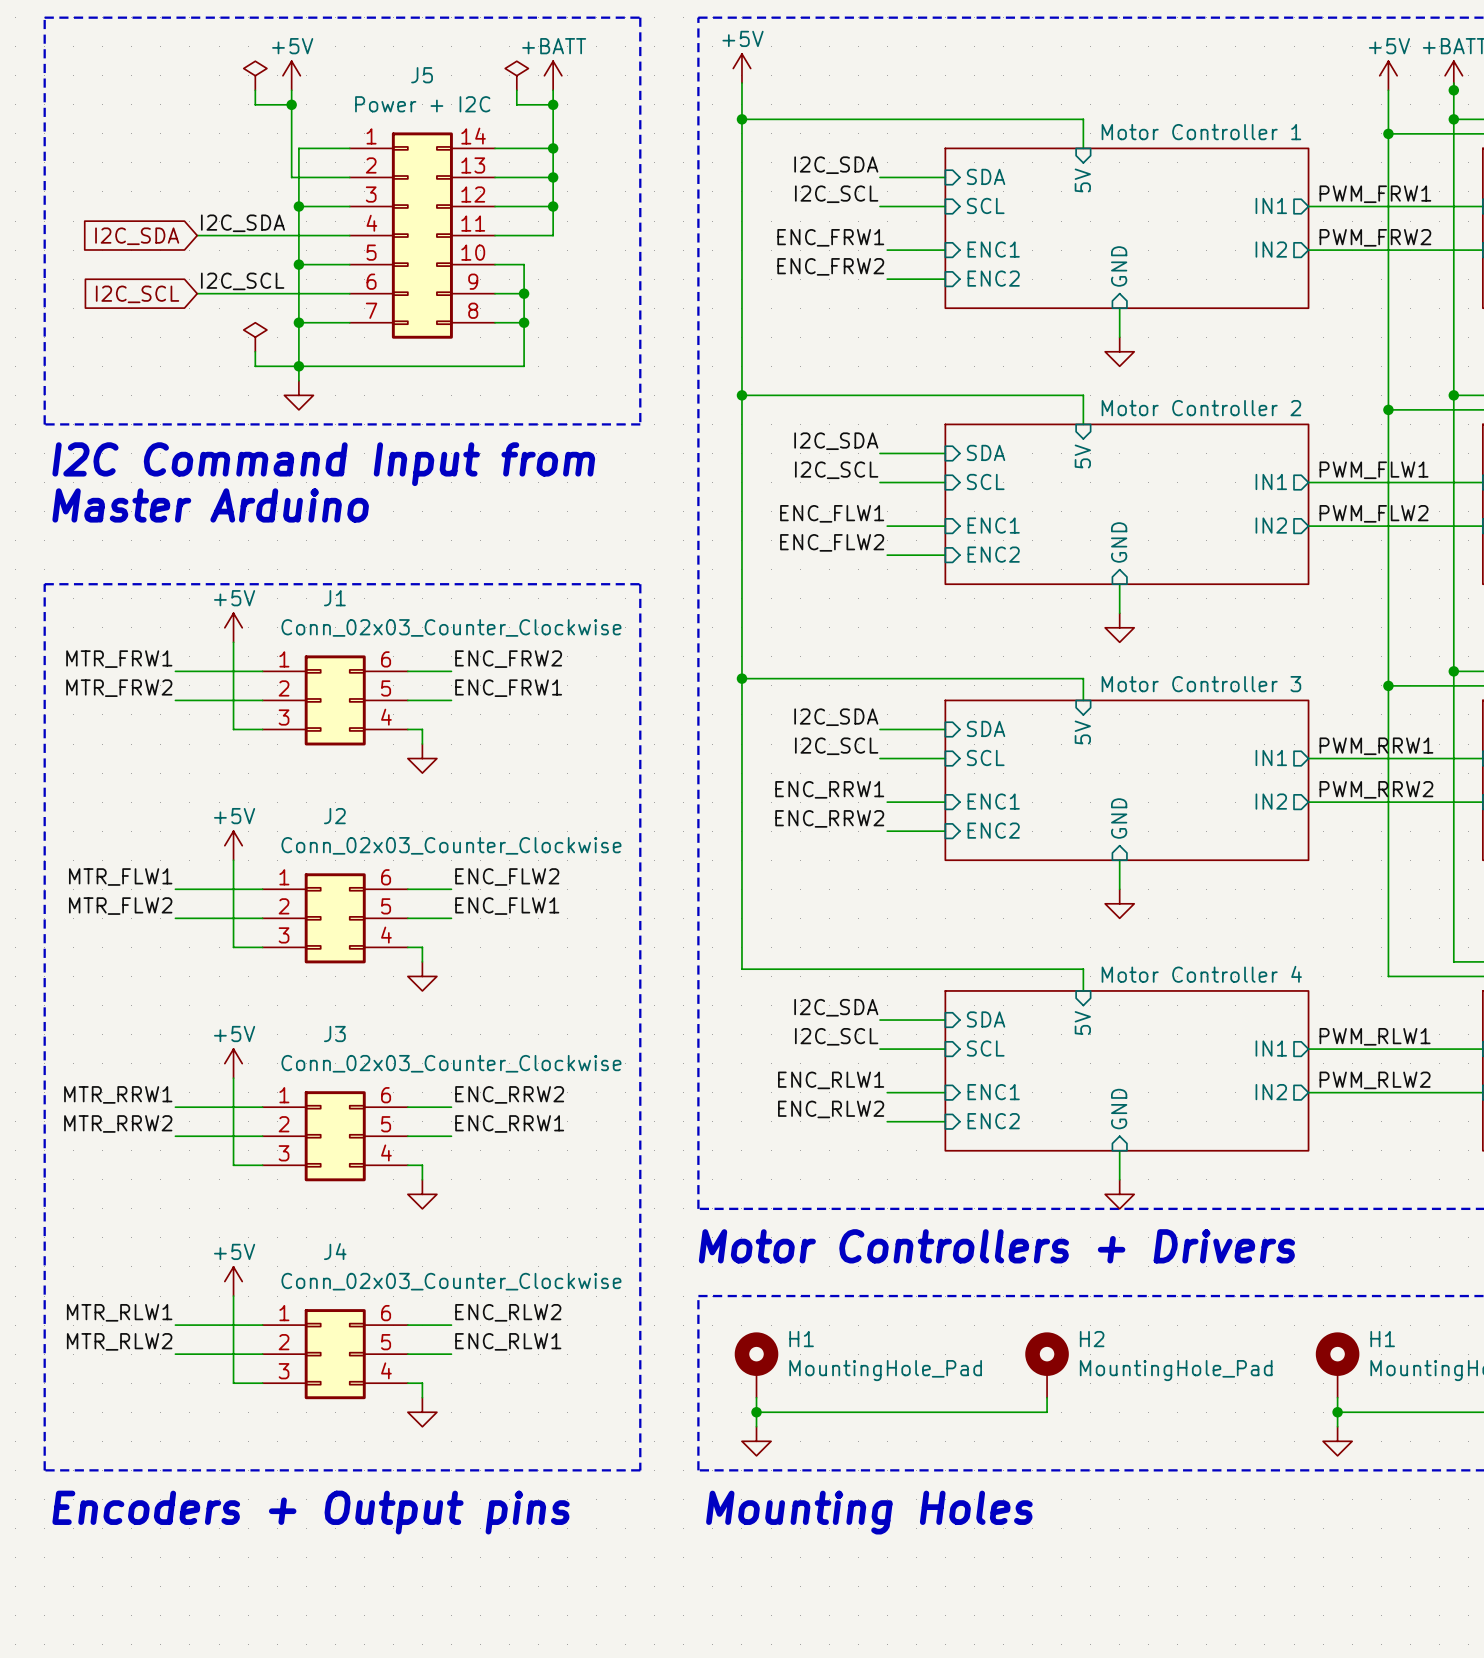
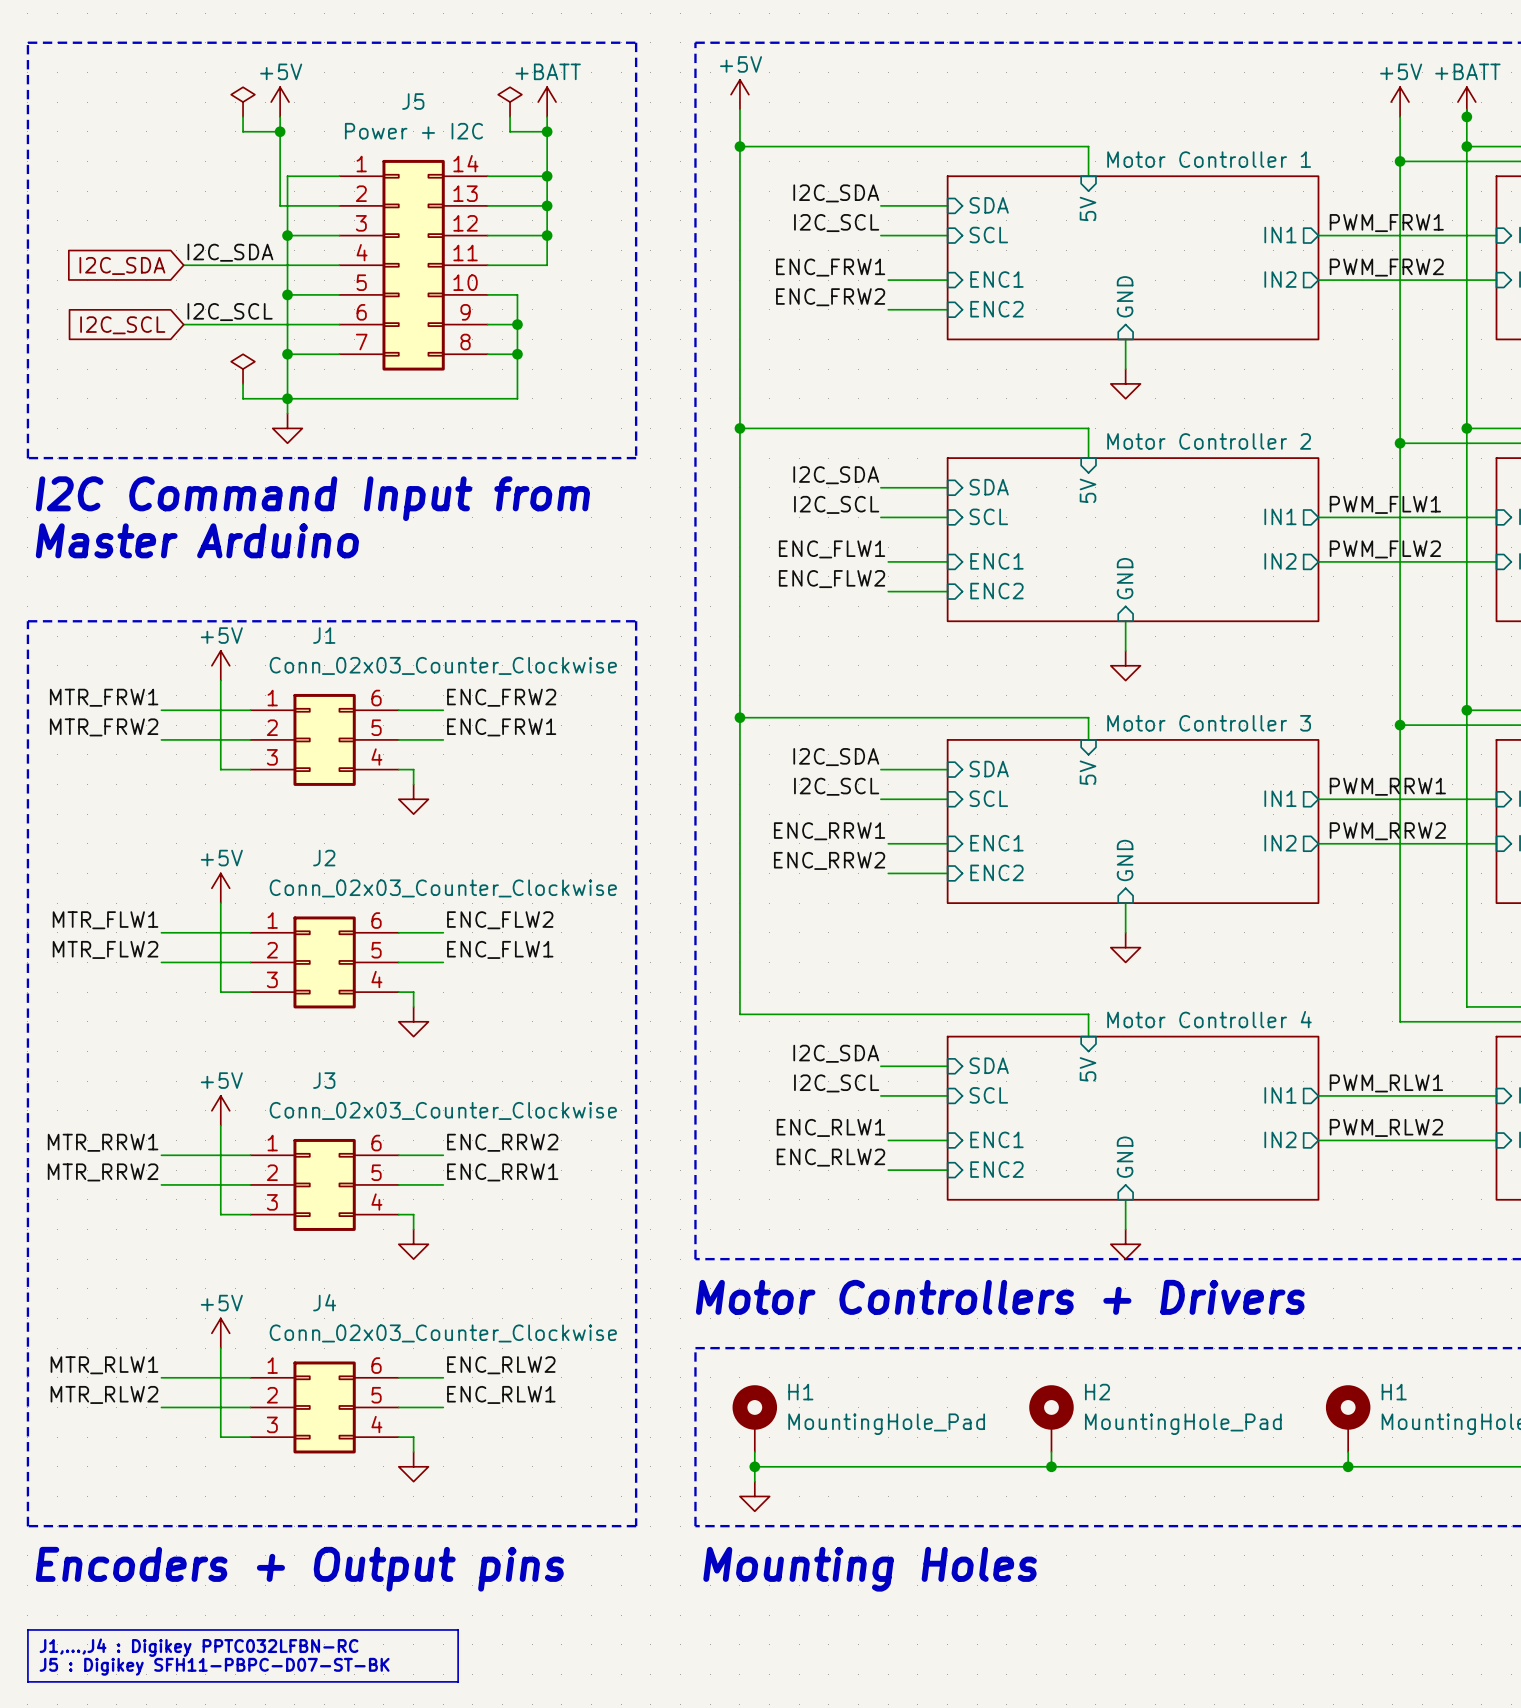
junction: none -> (1051, 1466)
wire: (1337, 1412) (1337, 1426) -> (1348, 1466) (1051, 1466)
power symbol: (1337, 1441) -> none
line: none -> (27, 1629) (458, 1629) (458, 1681) (27, 1681) (27, 1629)
text: none -> J1,...,J4 : Digikey PPTC032LFBN-RC (199, 1647)
text: none -> J5 : Digikey SFH11-PBPC-D07-ST-BK (214, 1666)

